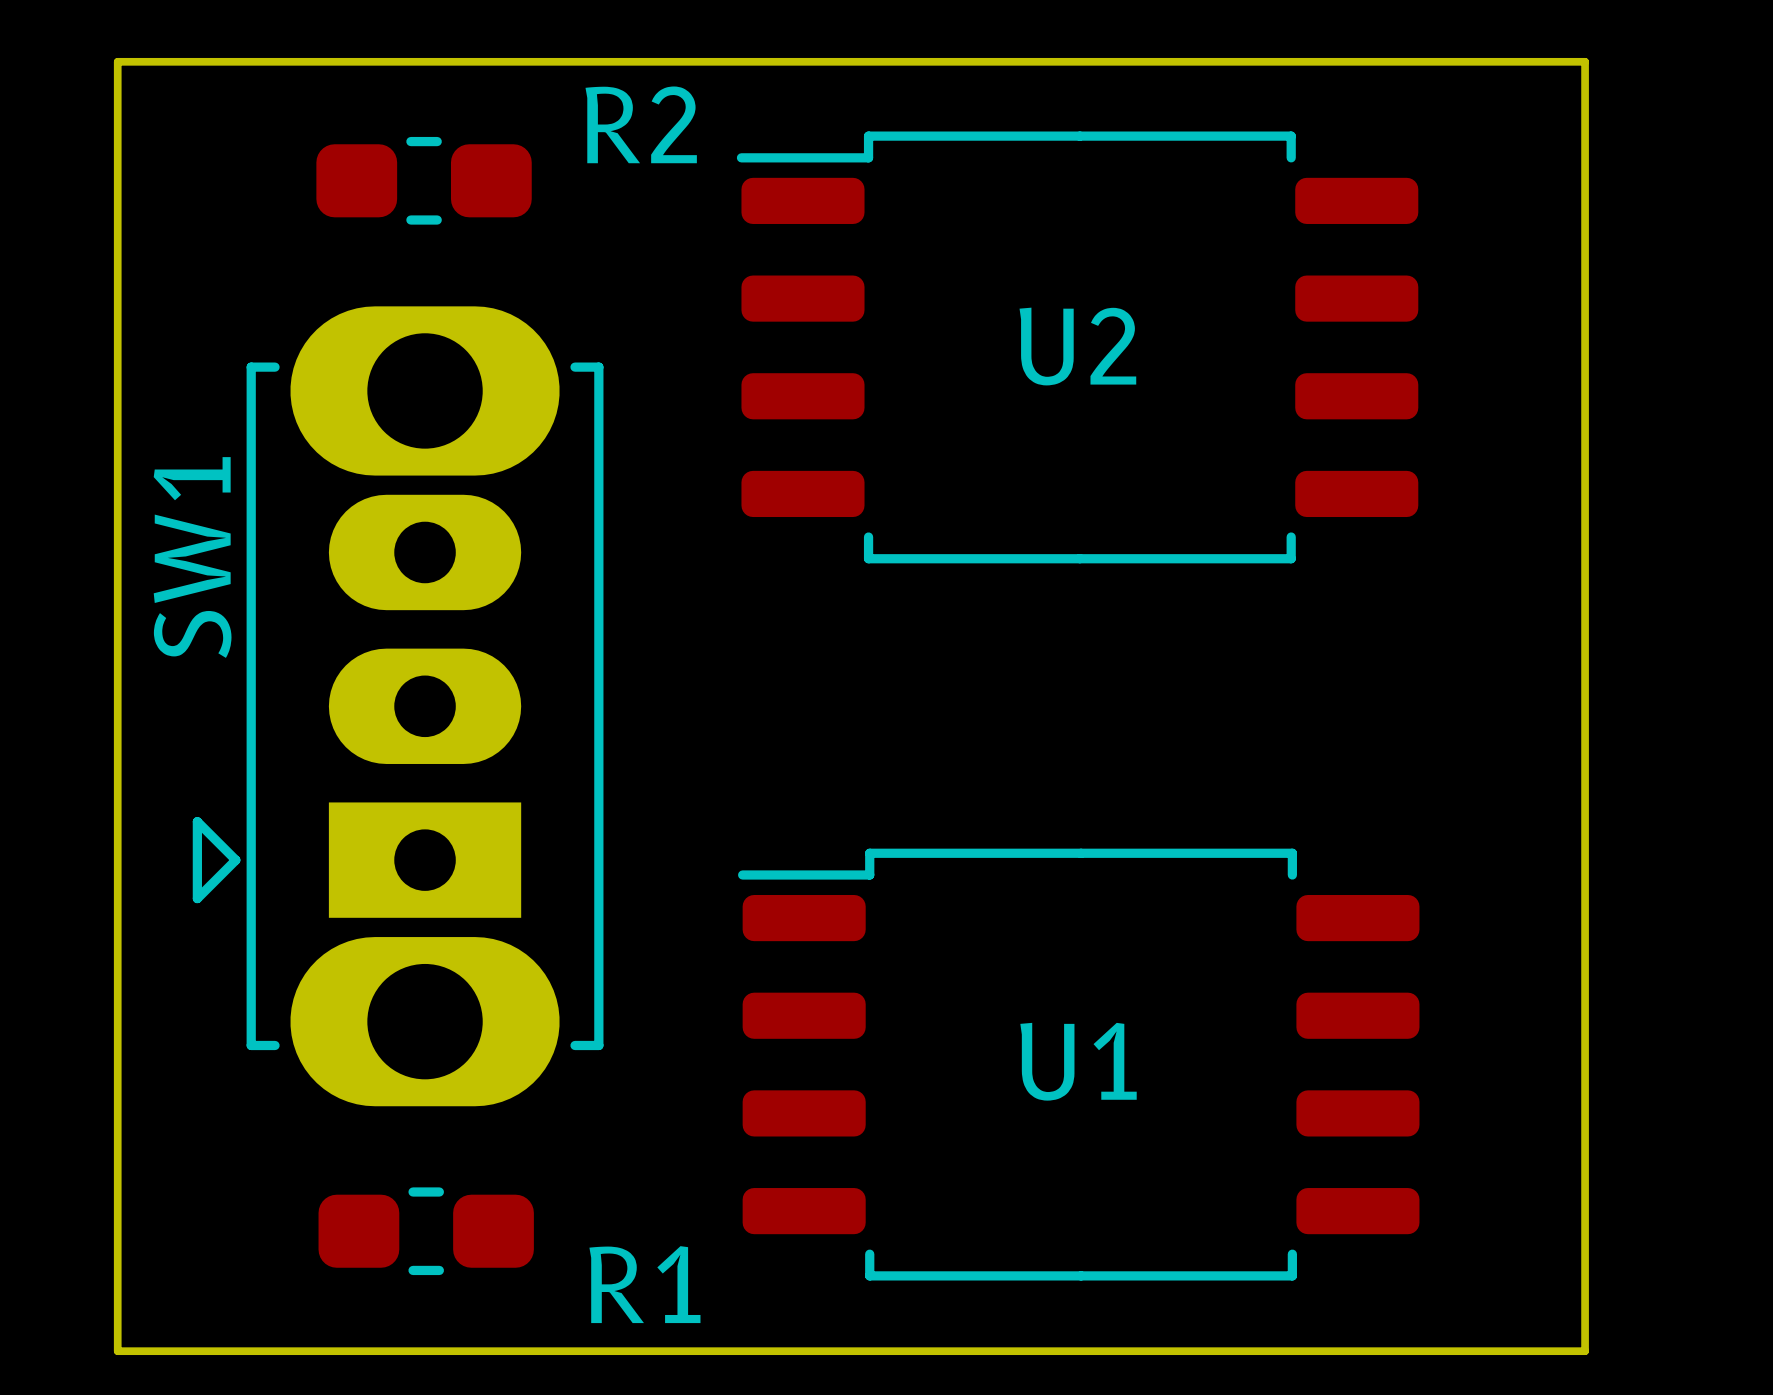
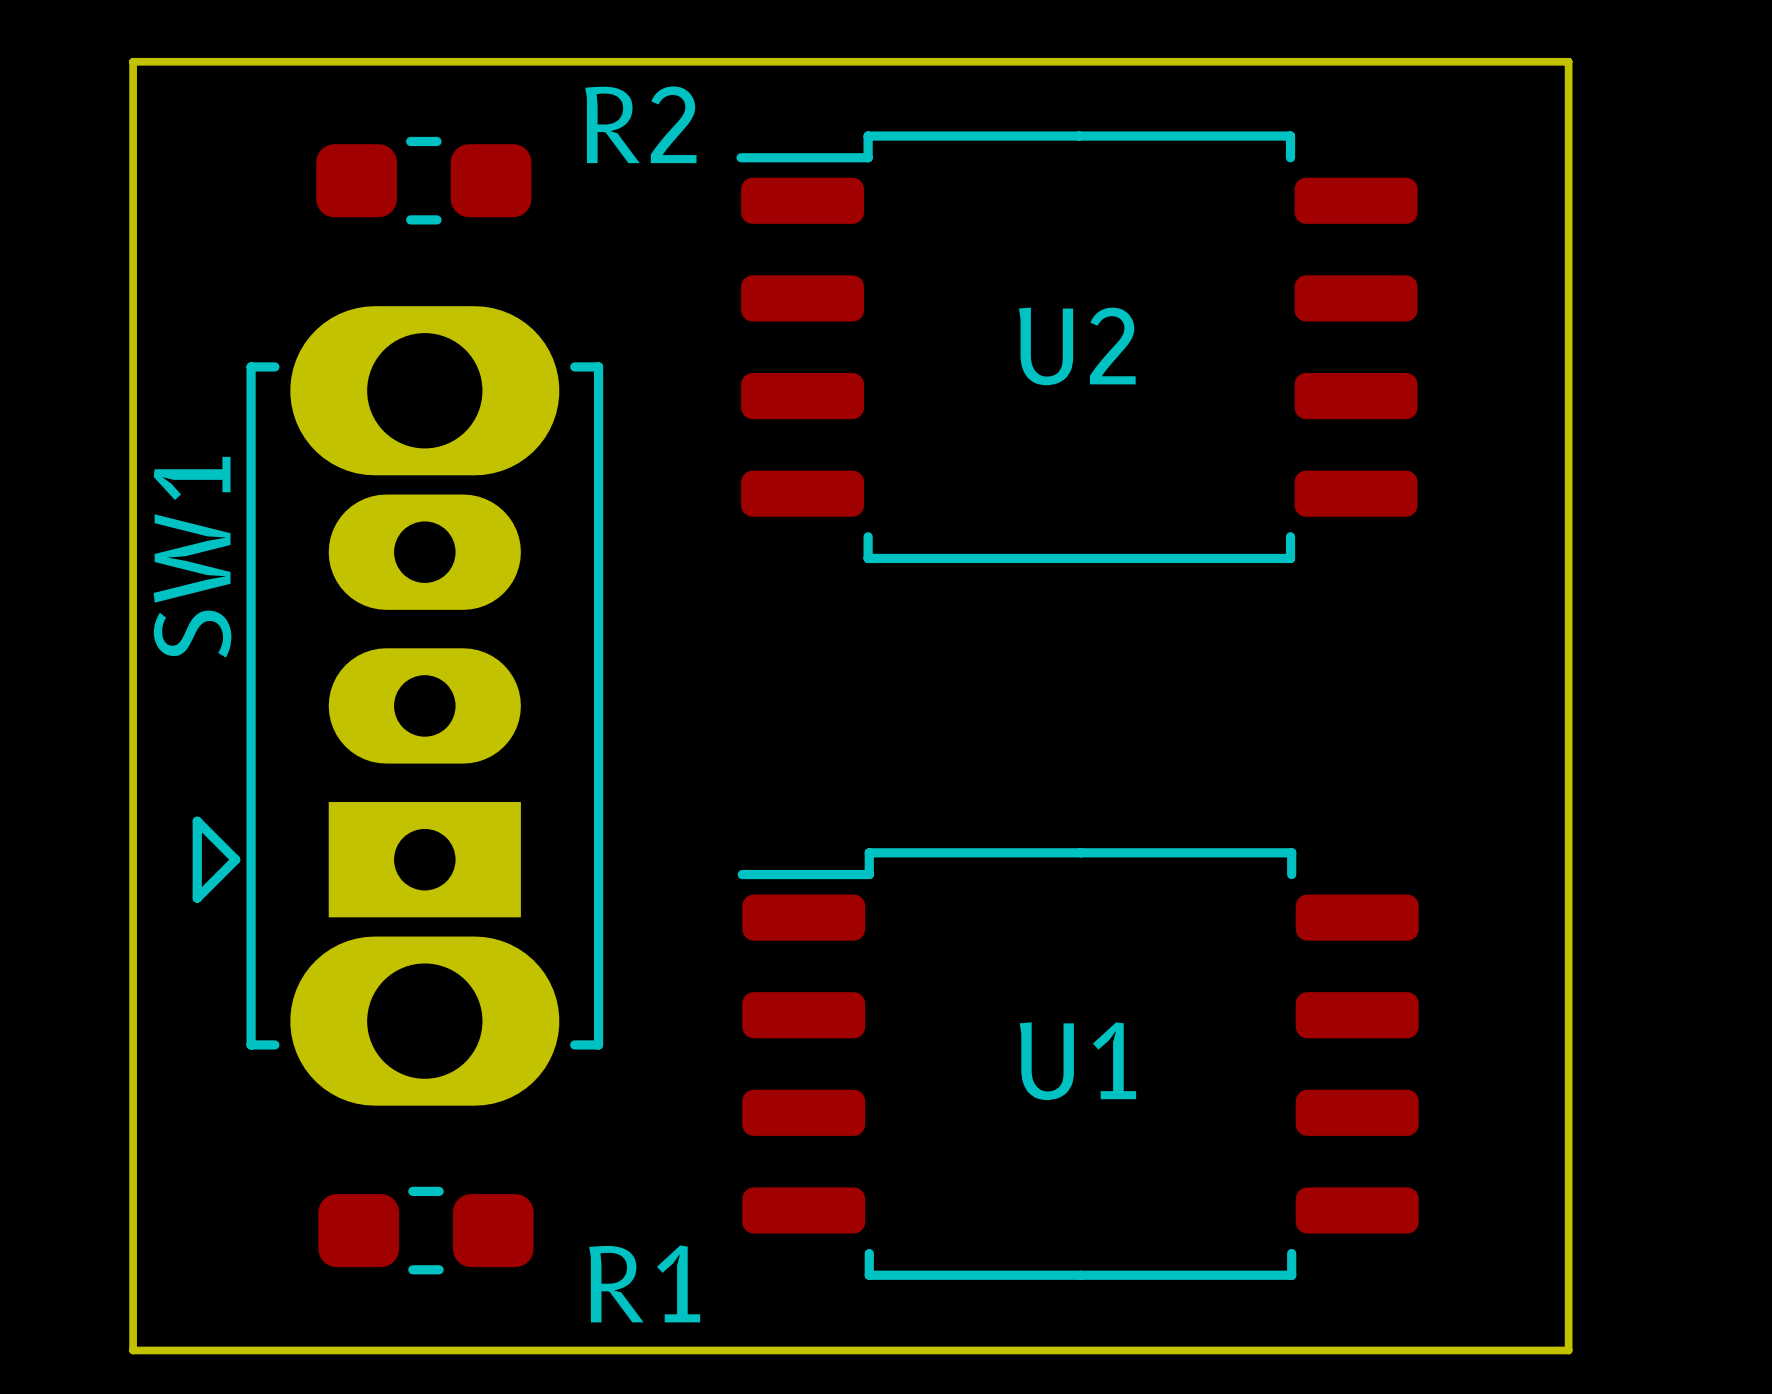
board edge: (133, 61) (117, 61) (117, 1351) (133, 1351) -> (133, 61) (133, 1350)
board edge: (1569, 61) (1585, 61) (1585, 1351) (1569, 1351) -> (1568, 61) (1568, 1350)

